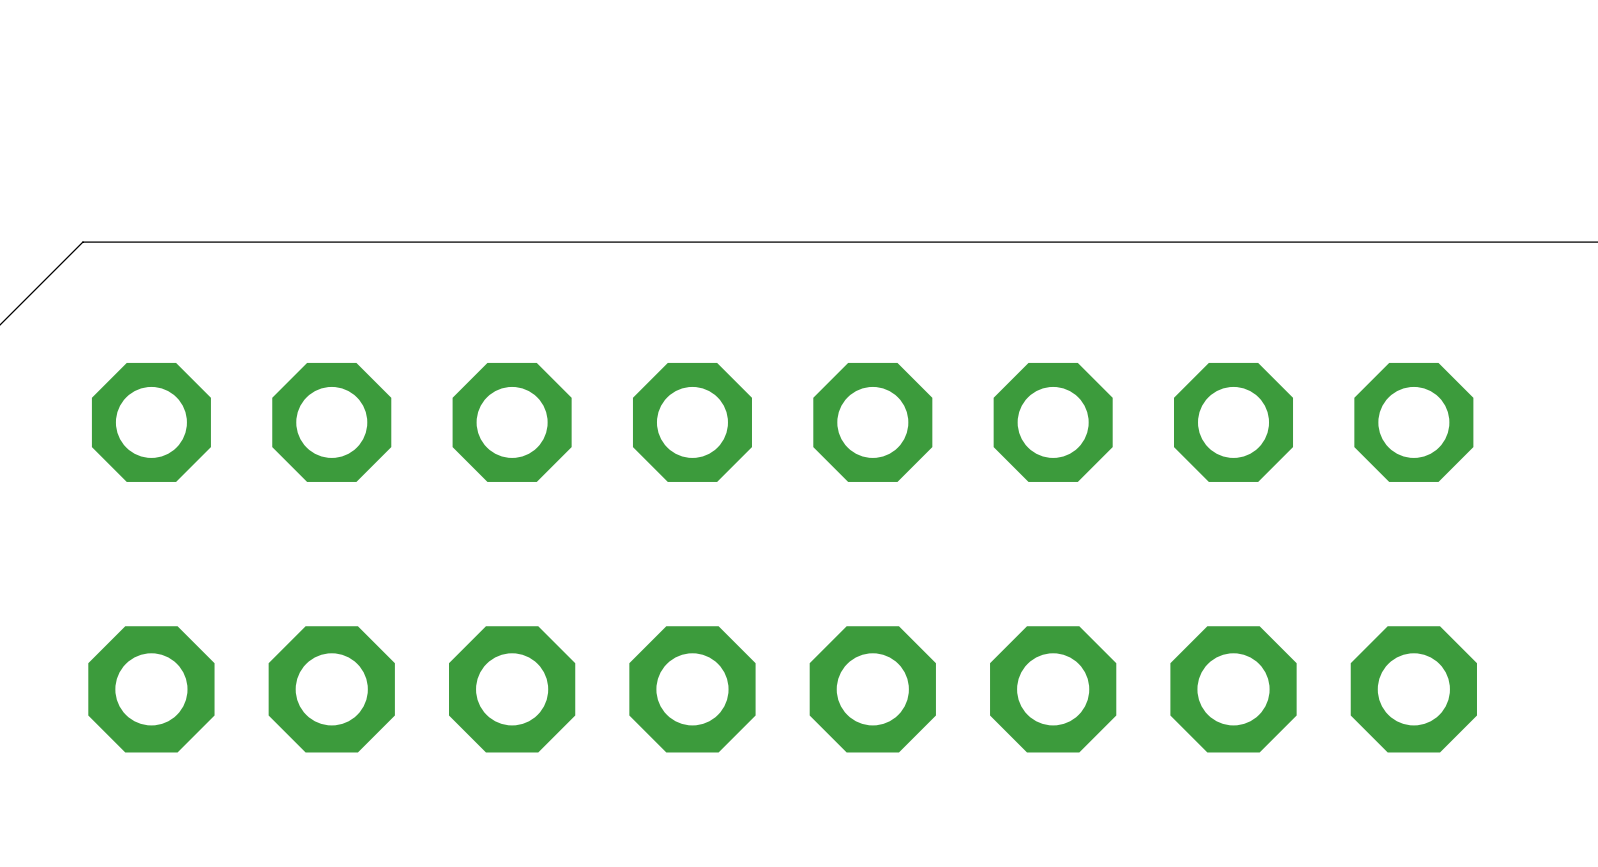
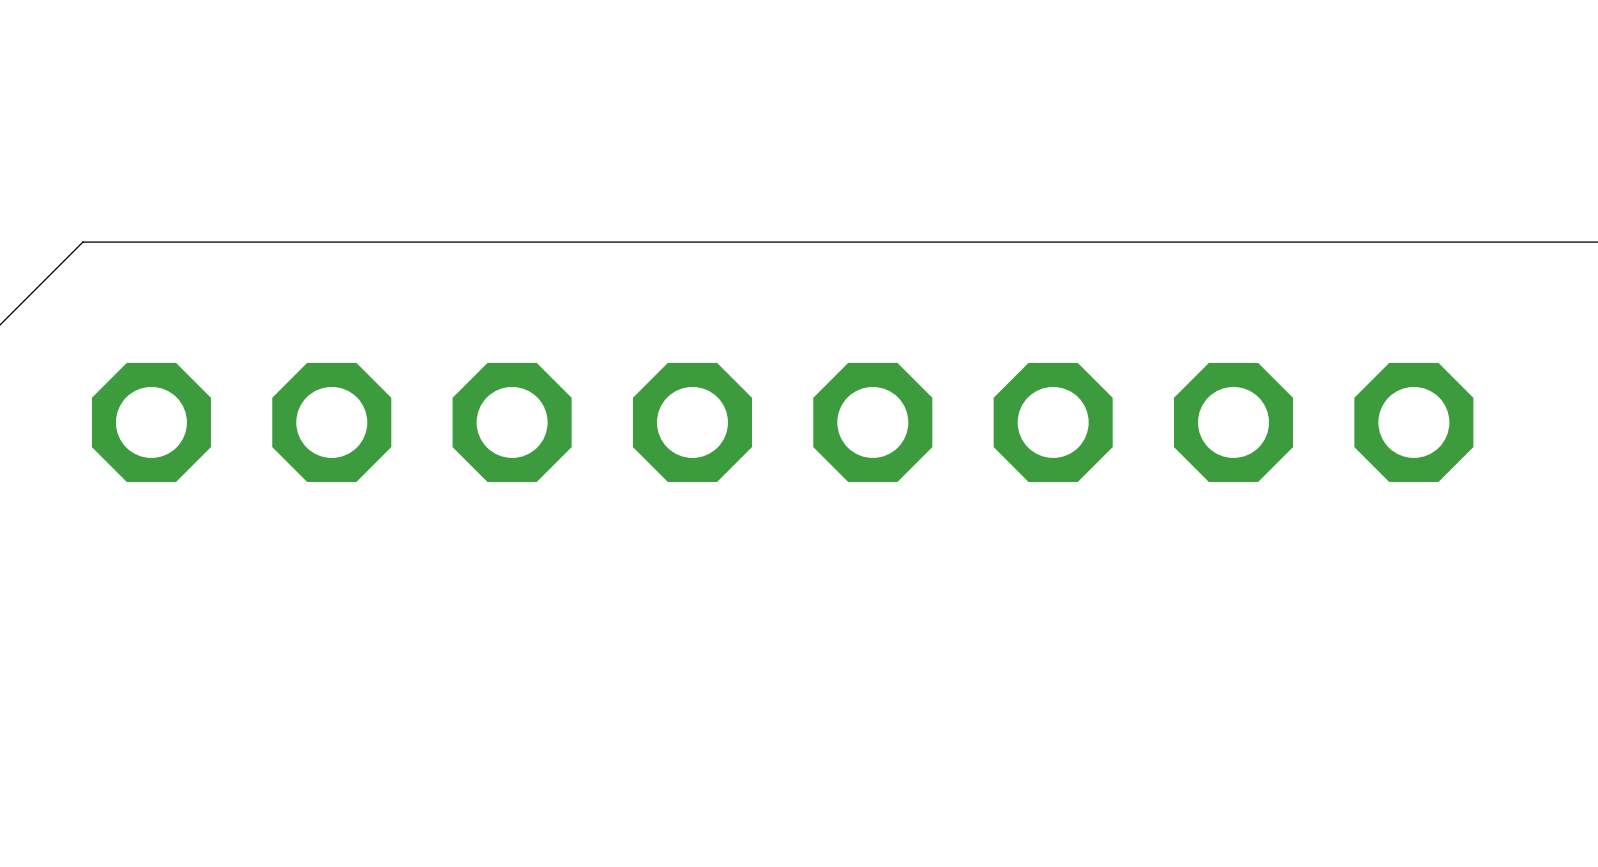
part: (782, 689) -> none

